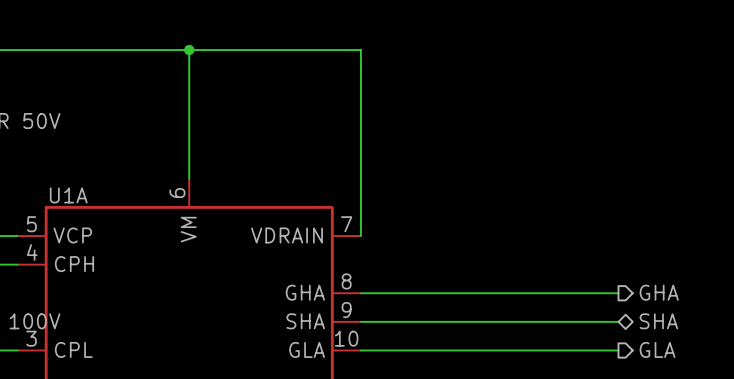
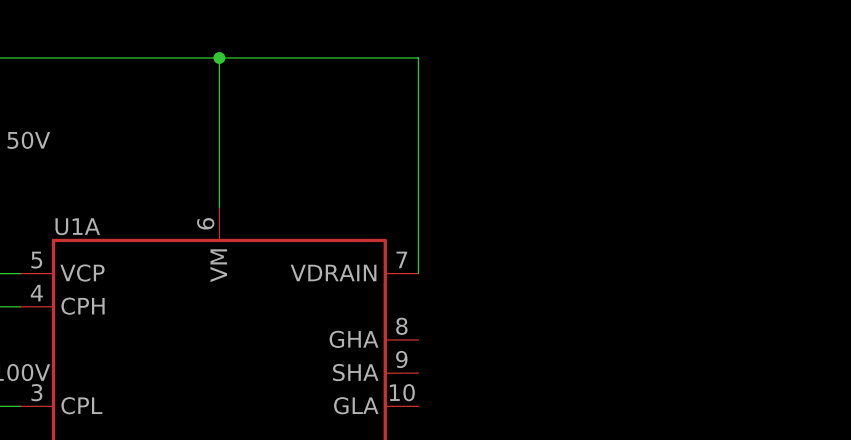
hierarchical label: GHA (659, 292) -> none
wire: (360, 293) (618, 293) -> none
wire: (360, 321) (618, 321) -> none
hierarchical label: SHA (658, 321) -> none
hierarchical label: GLA (657, 349) -> none
wire: (360, 350) (618, 350) -> none

